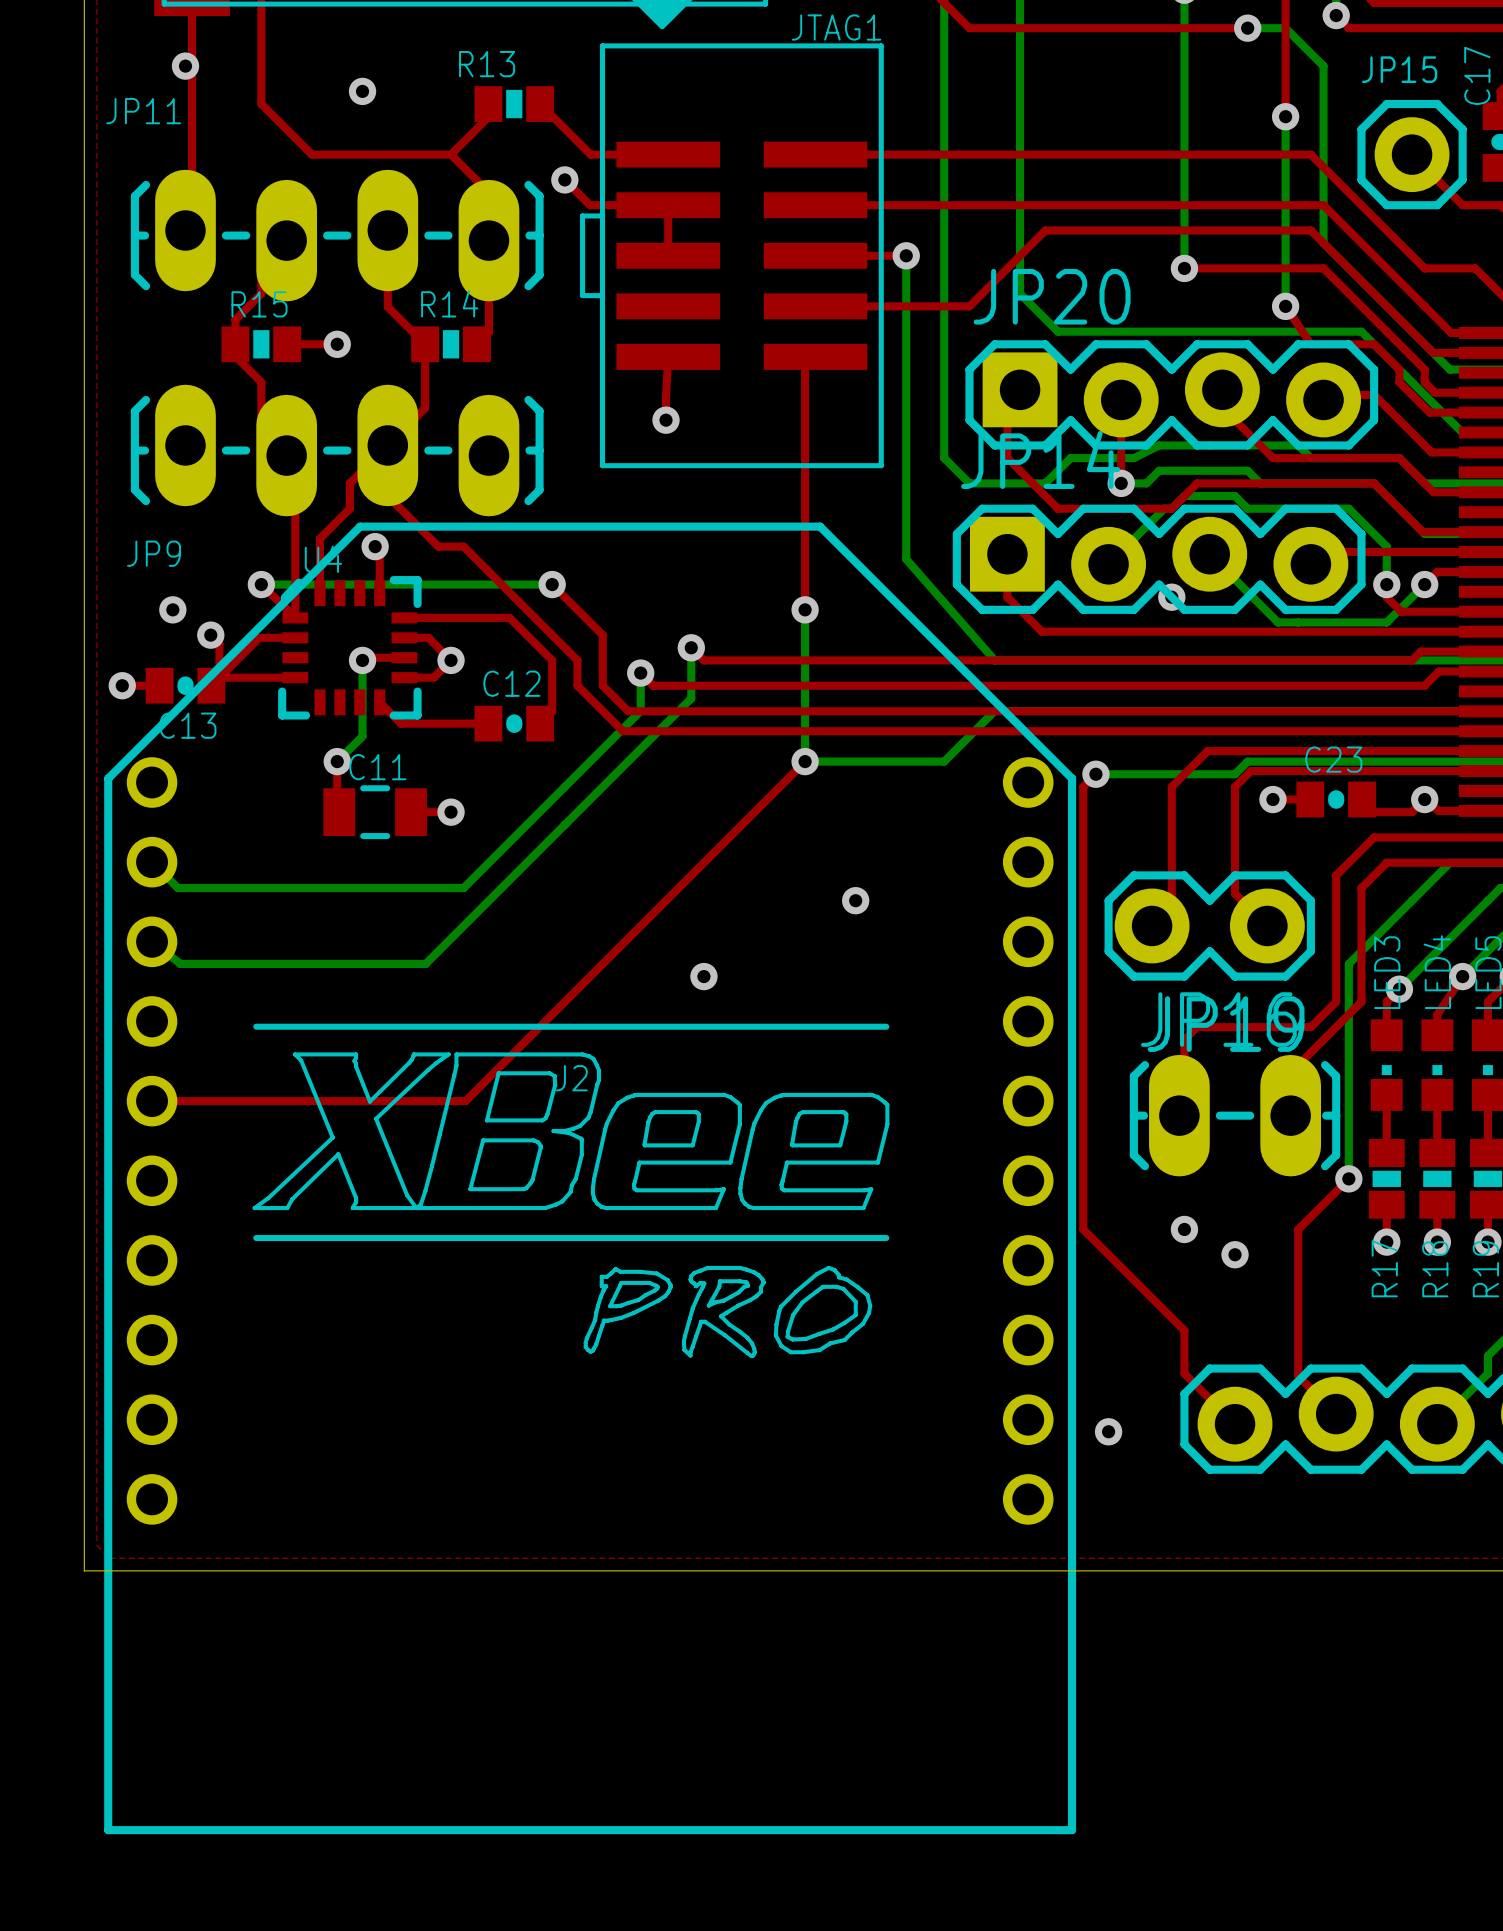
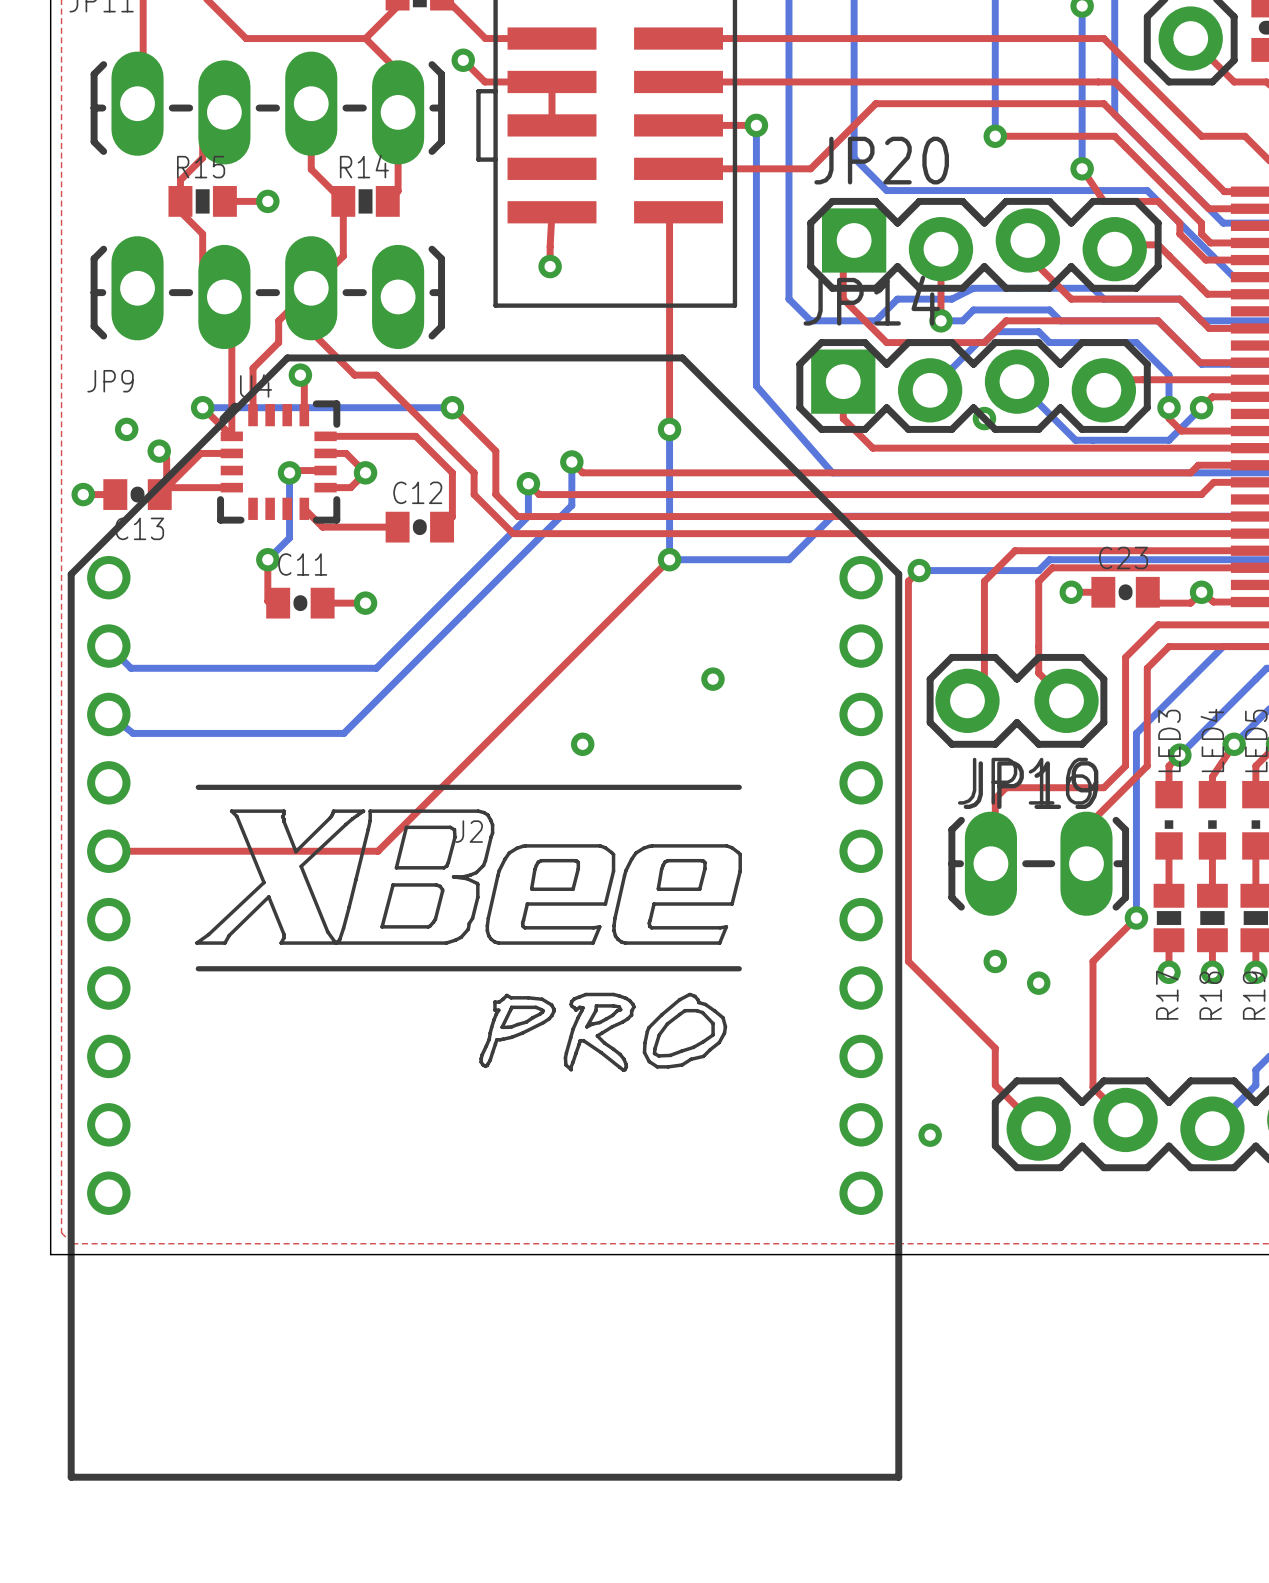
C11 footprint: [323, 785, 427, 840] -> [266, 587, 335, 619]

